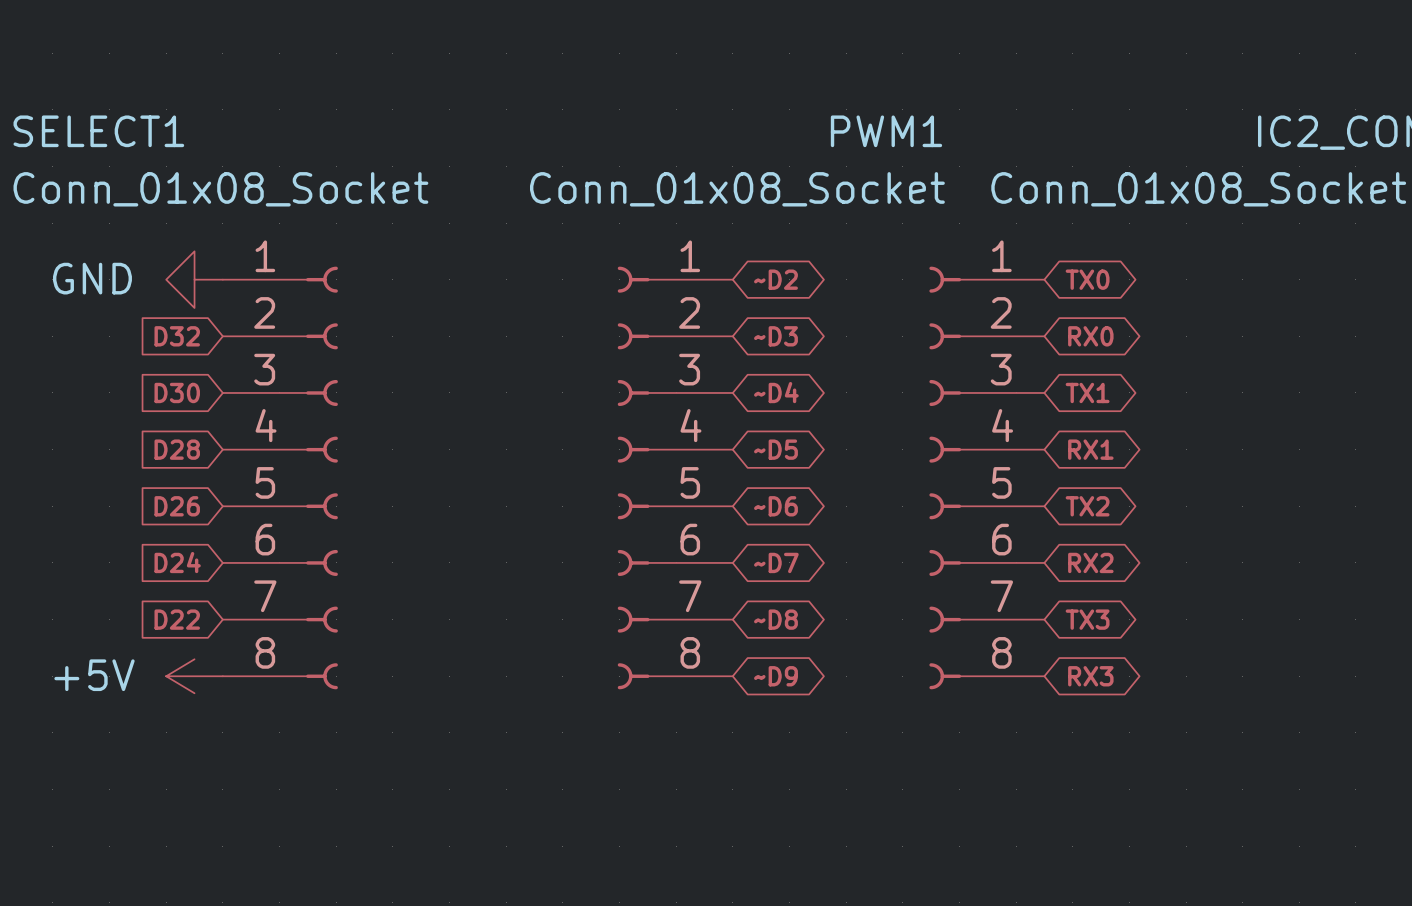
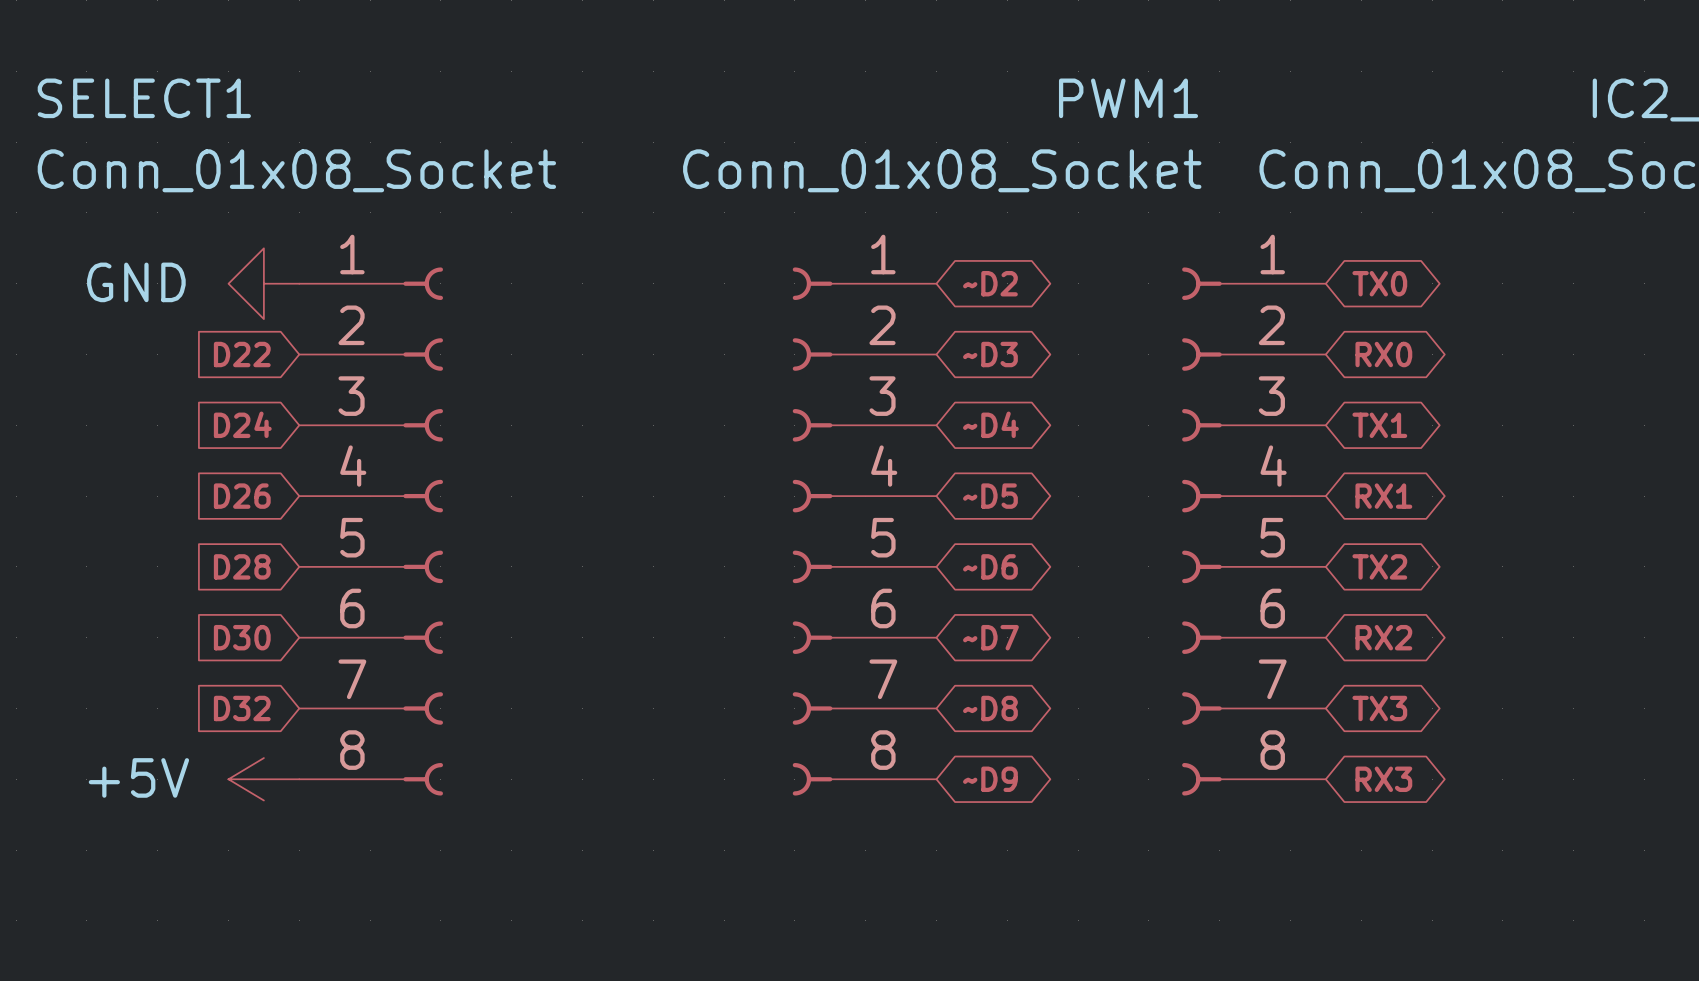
global label: D32 (177, 336) -> D22 (242, 354)
global label: D30 (177, 392) -> D24 (242, 424)
global label: D28 (177, 449) -> D26 (242, 496)
global label: D26 (177, 506) -> D28 (242, 566)
global label: D24 (177, 562) -> D30 (242, 637)
global label: D22 (177, 619) -> D32 (242, 708)

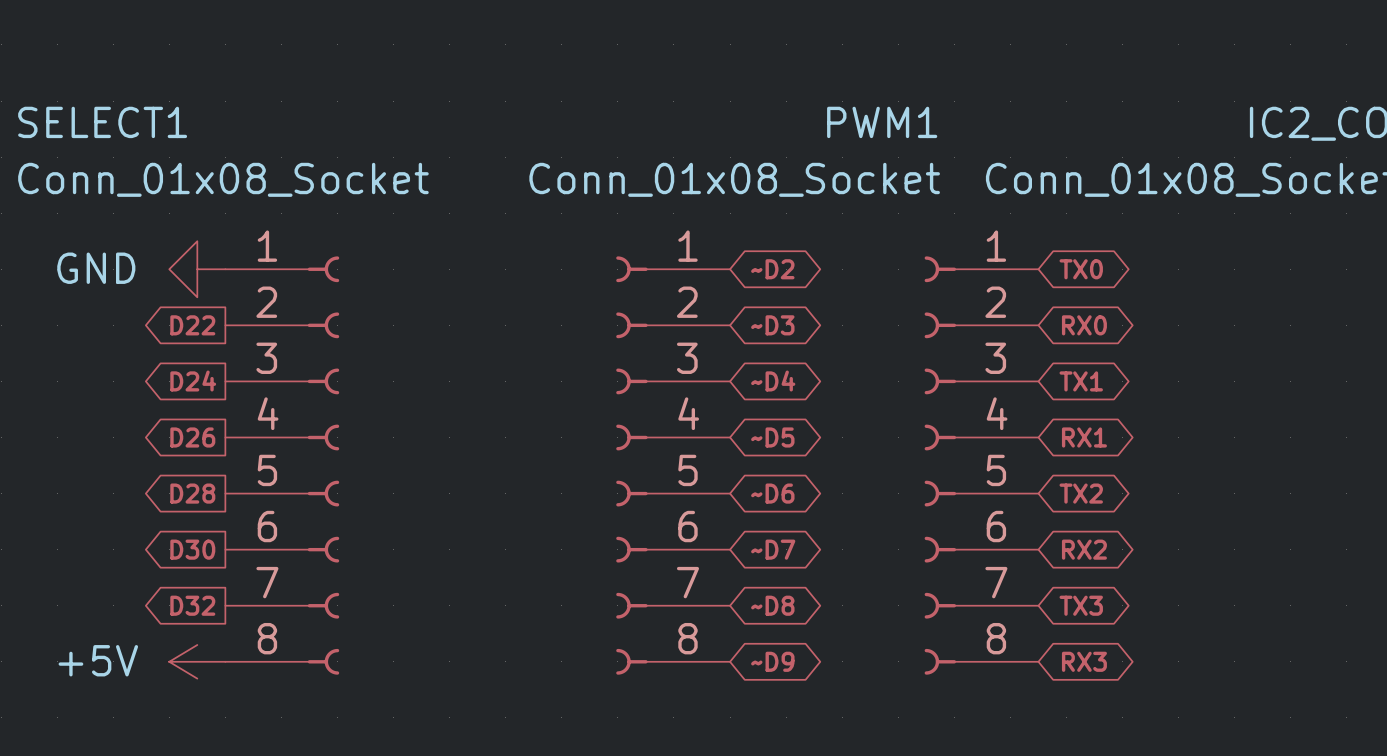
global label shape: input (242, 354) -> output (192, 325)
global label shape: input (242, 424) -> output (193, 381)
global label shape: input (242, 496) -> output (192, 437)
global label shape: input (242, 566) -> output (192, 493)
global label shape: input (242, 637) -> output (192, 549)
global label shape: input (242, 708) -> output (192, 605)

